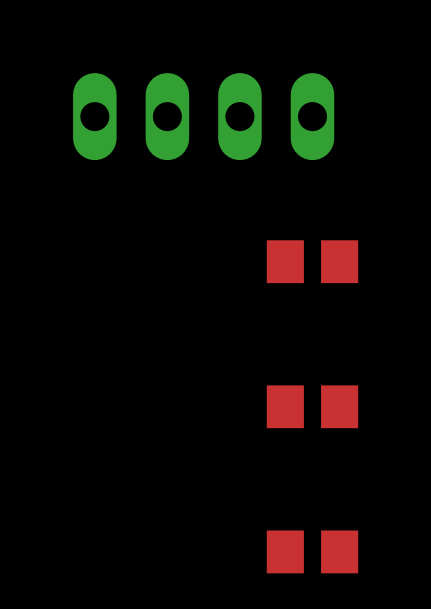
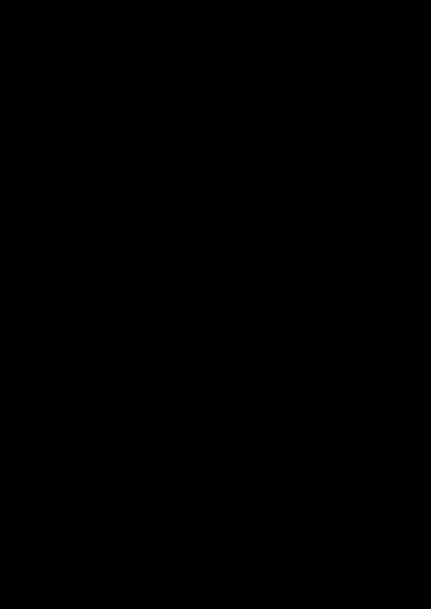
part: (203, 116) -> none
part: (312, 261) -> none
part: (312, 406) -> none
part: (312, 551) -> none

